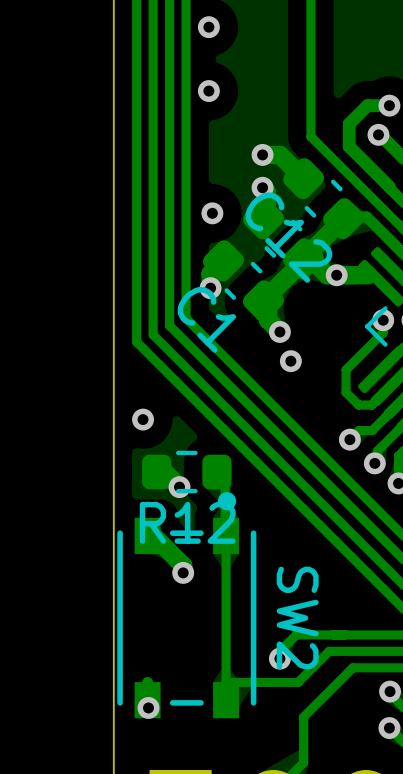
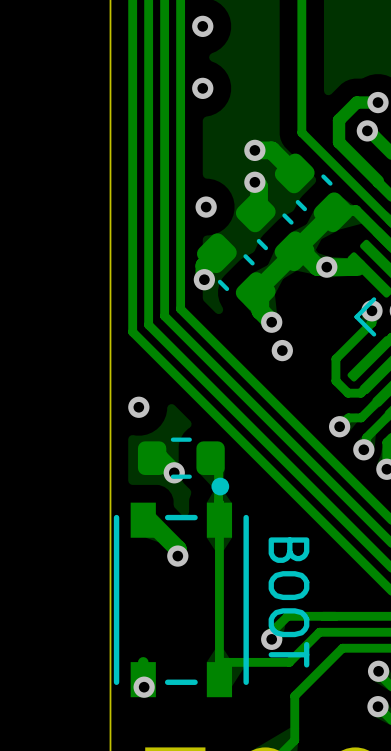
C12 name: C12 (288, 237) -> none
C1 name: C1 (206, 319) -> none
R12 name: R12 (187, 522) -> none
SW2 name: SW2 (297, 618) -> BOOT (288, 602)

